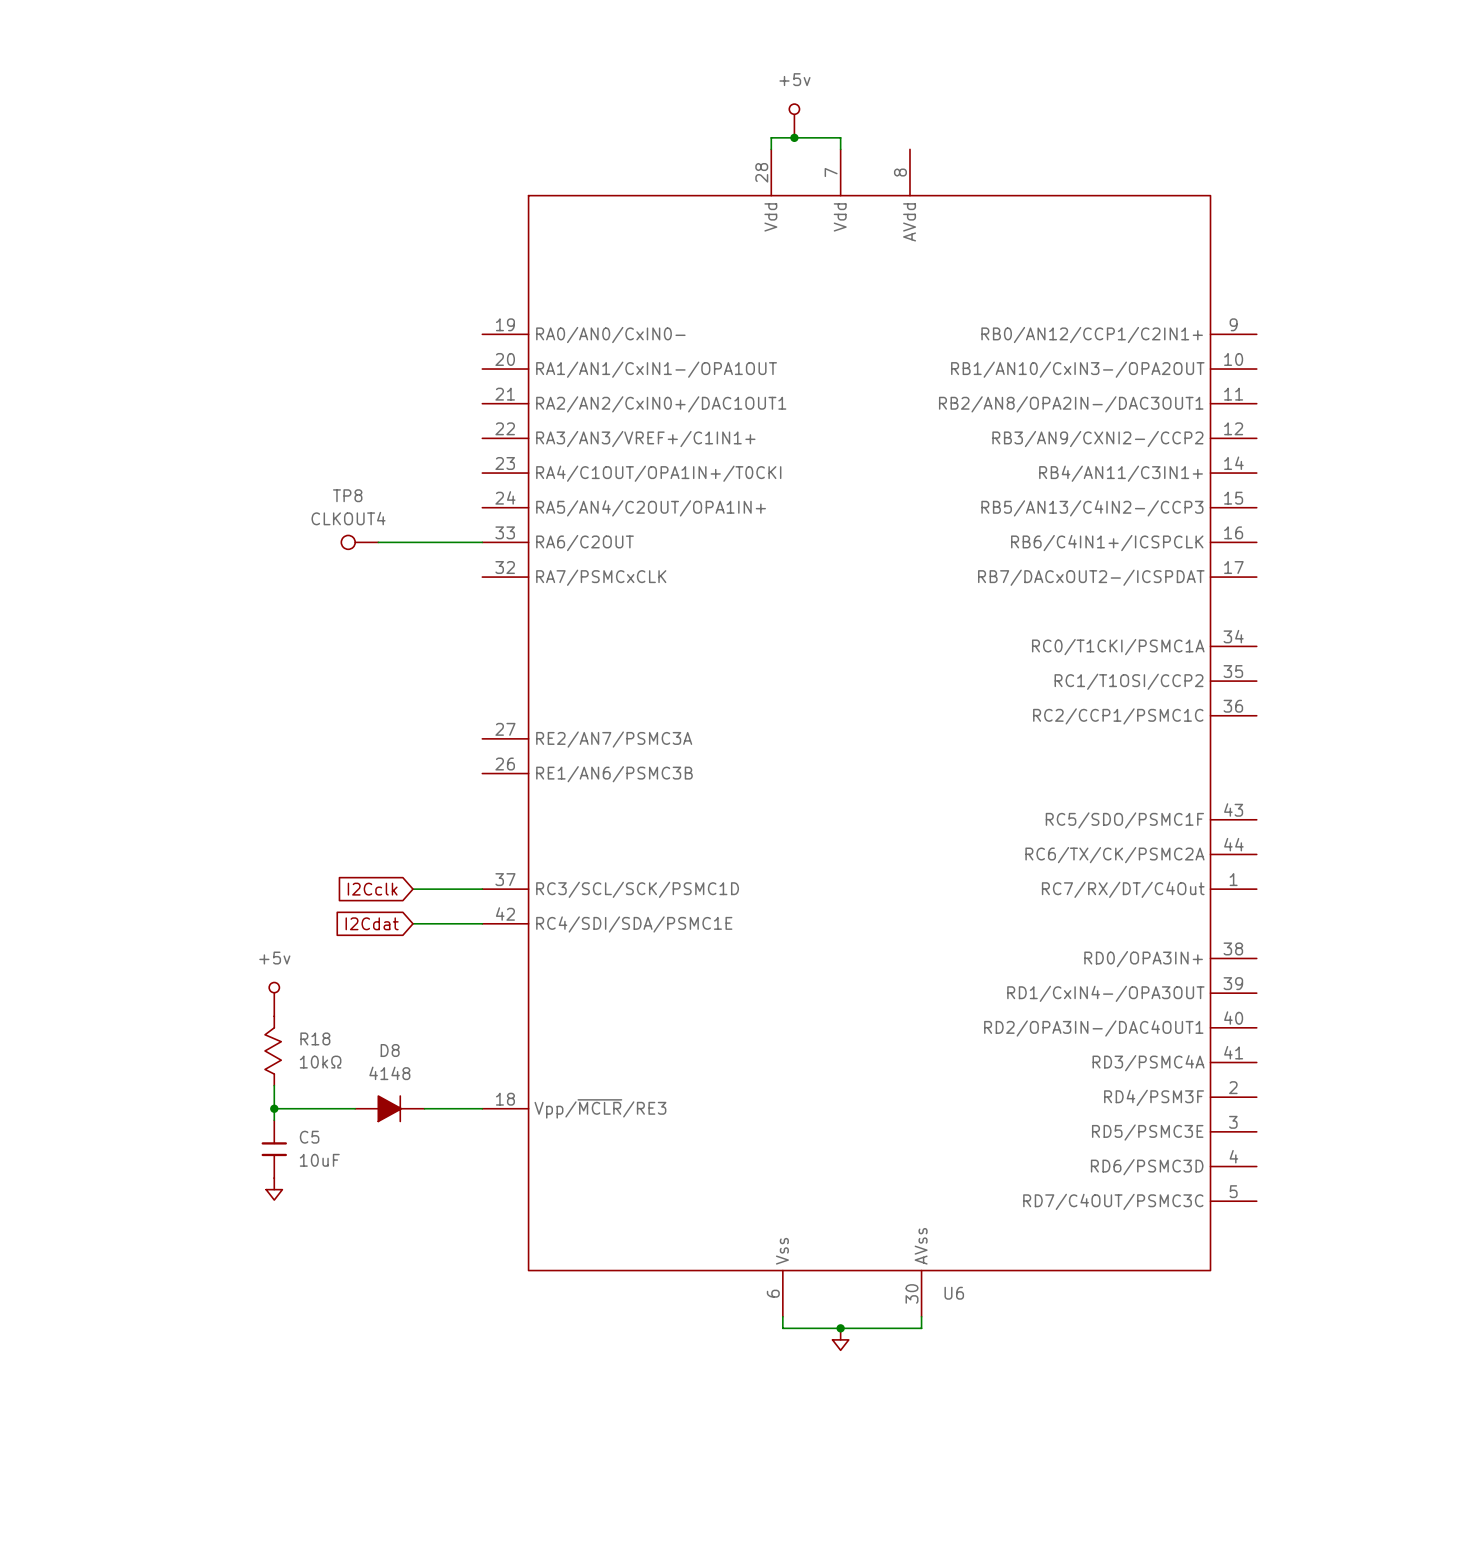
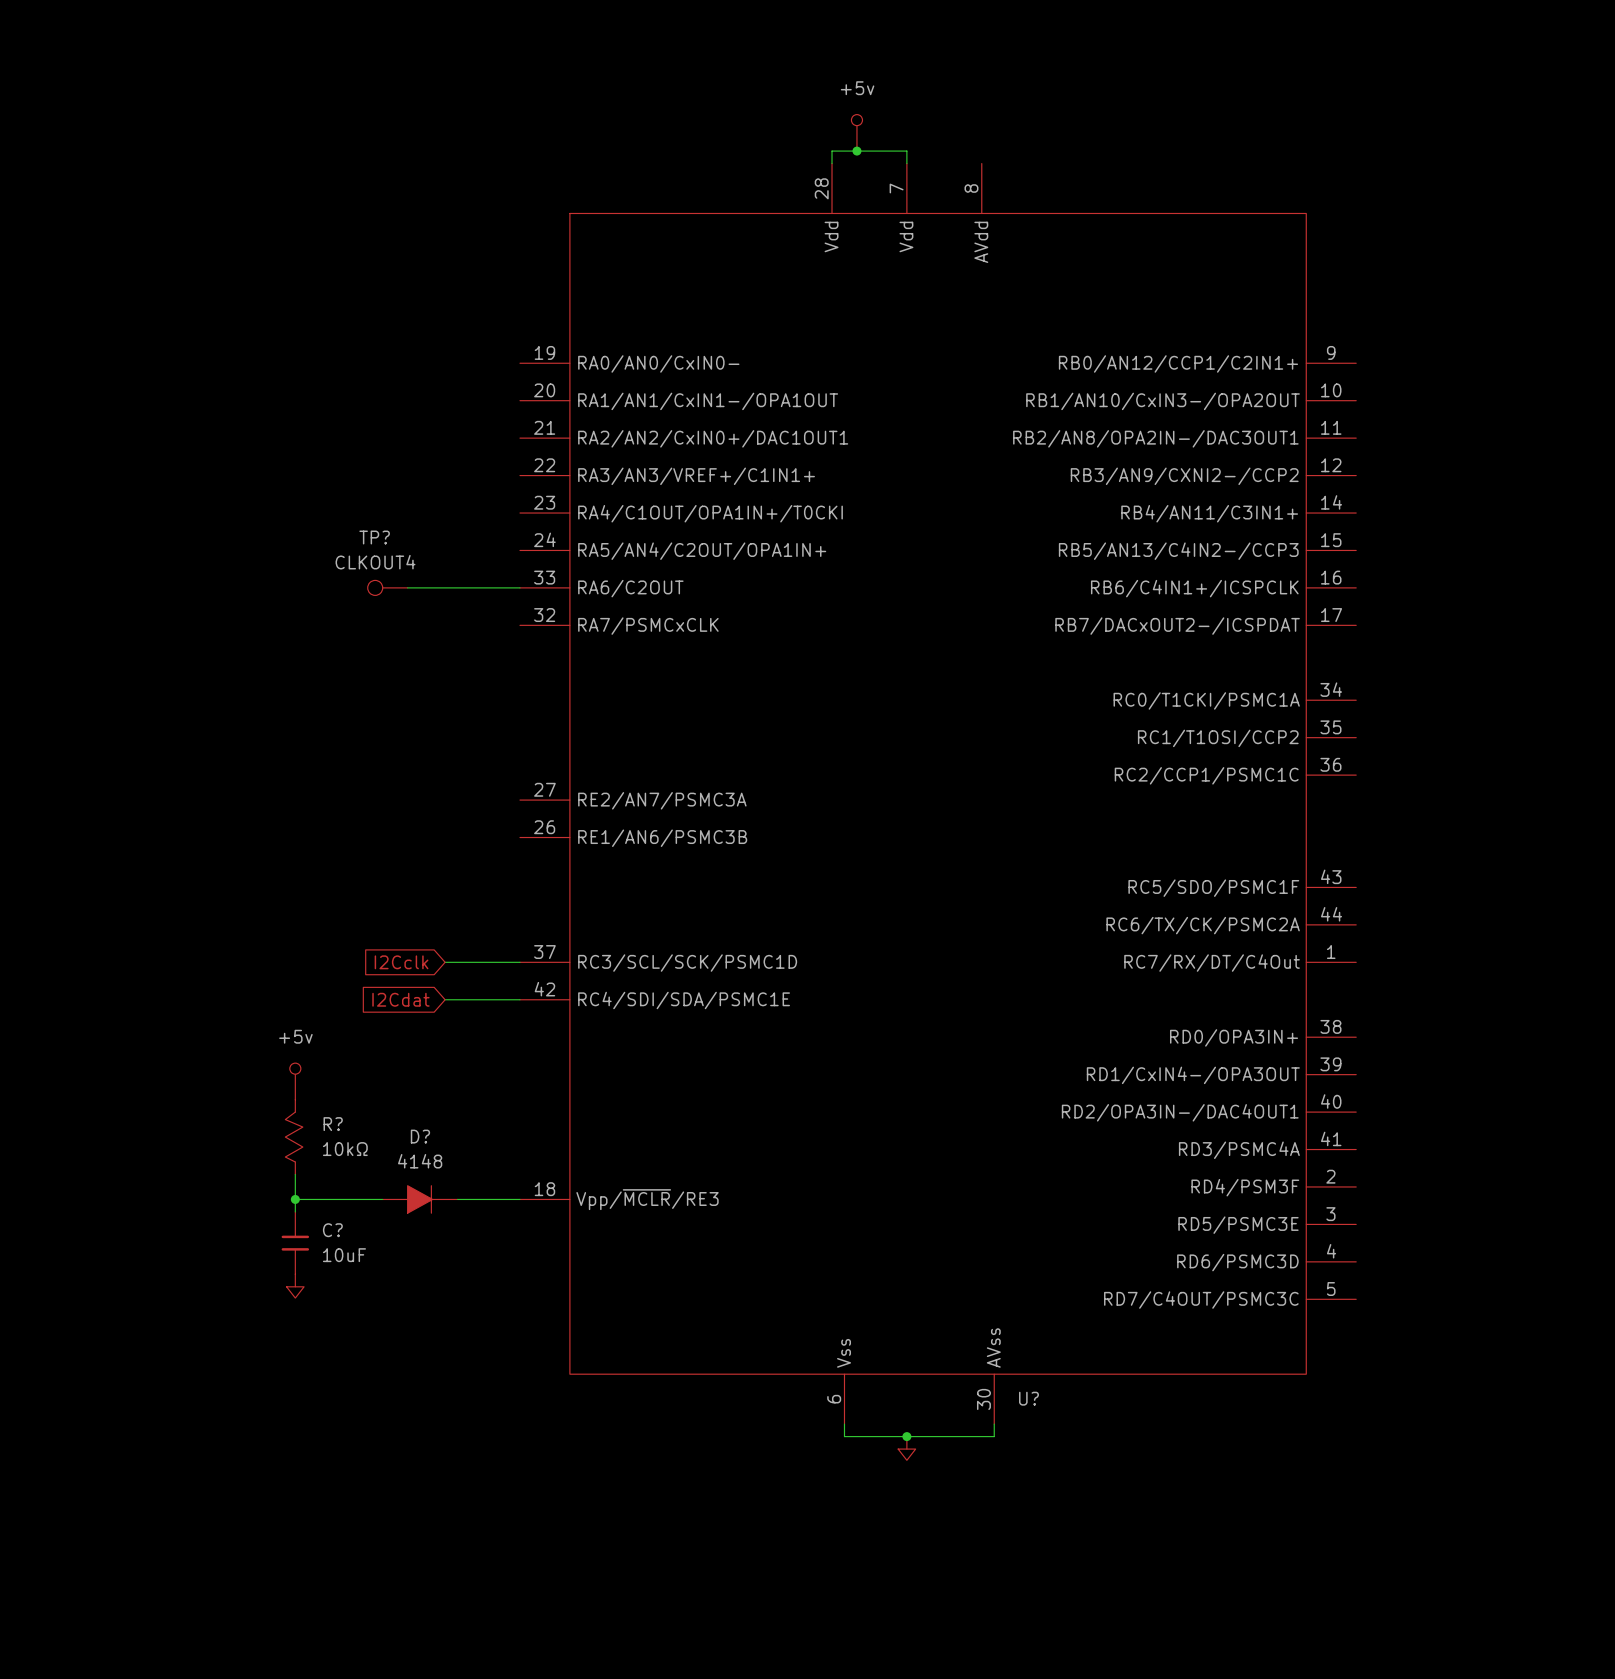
TP8 name: TP8 (347, 495) -> TP? (374, 537)
R18 name: R18 (315, 1038) -> R? (333, 1124)
D8 name: D8 (390, 1050) -> D? (420, 1136)
C5 name: C5 (309, 1137) -> C? (332, 1230)
U6 name: U6 (954, 1293) -> U? (1028, 1398)

